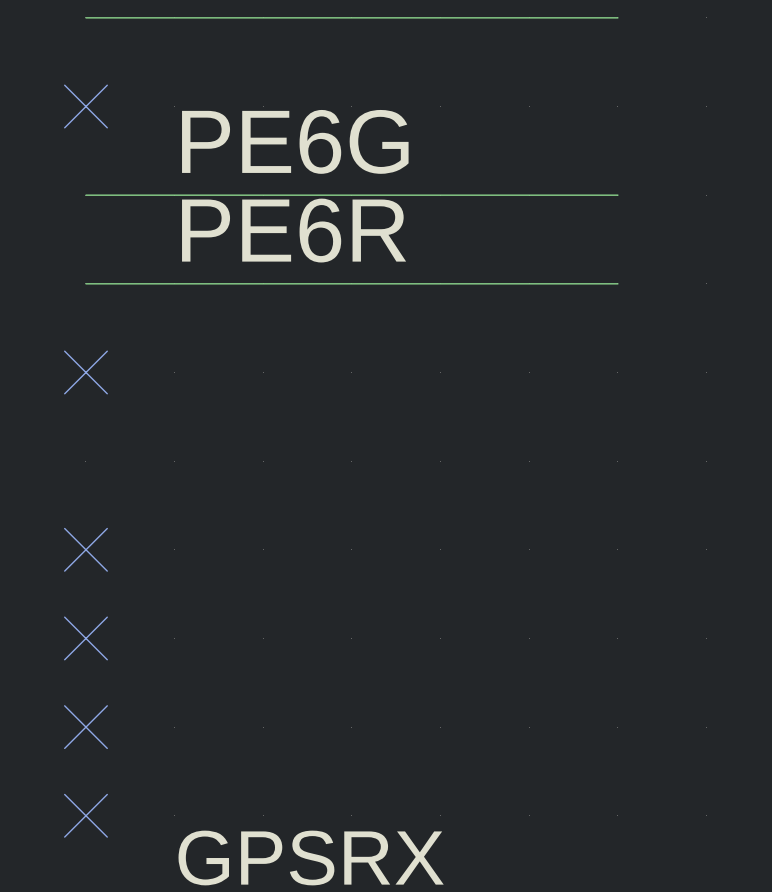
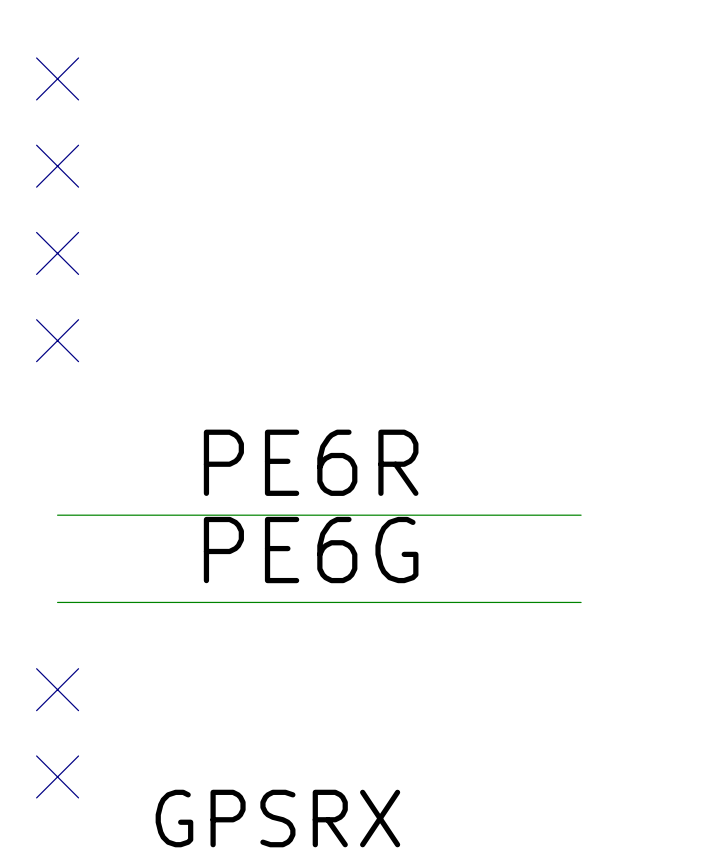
label position: PE6G (295, 141) -> PE6G (311, 550)
wire: (85, 195) (617, 195) -> (57, 515) (581, 515)
no-connect mark: none -> (57, 166)
label position: PE6R (294, 230) -> PE6R (311, 462)
wire: (85, 283) (617, 283) -> (57, 602) (581, 602)
no-connect mark: none -> (57, 253)
no-connect mark: (85, 549) -> none
no-connect mark: (85, 638) -> none

